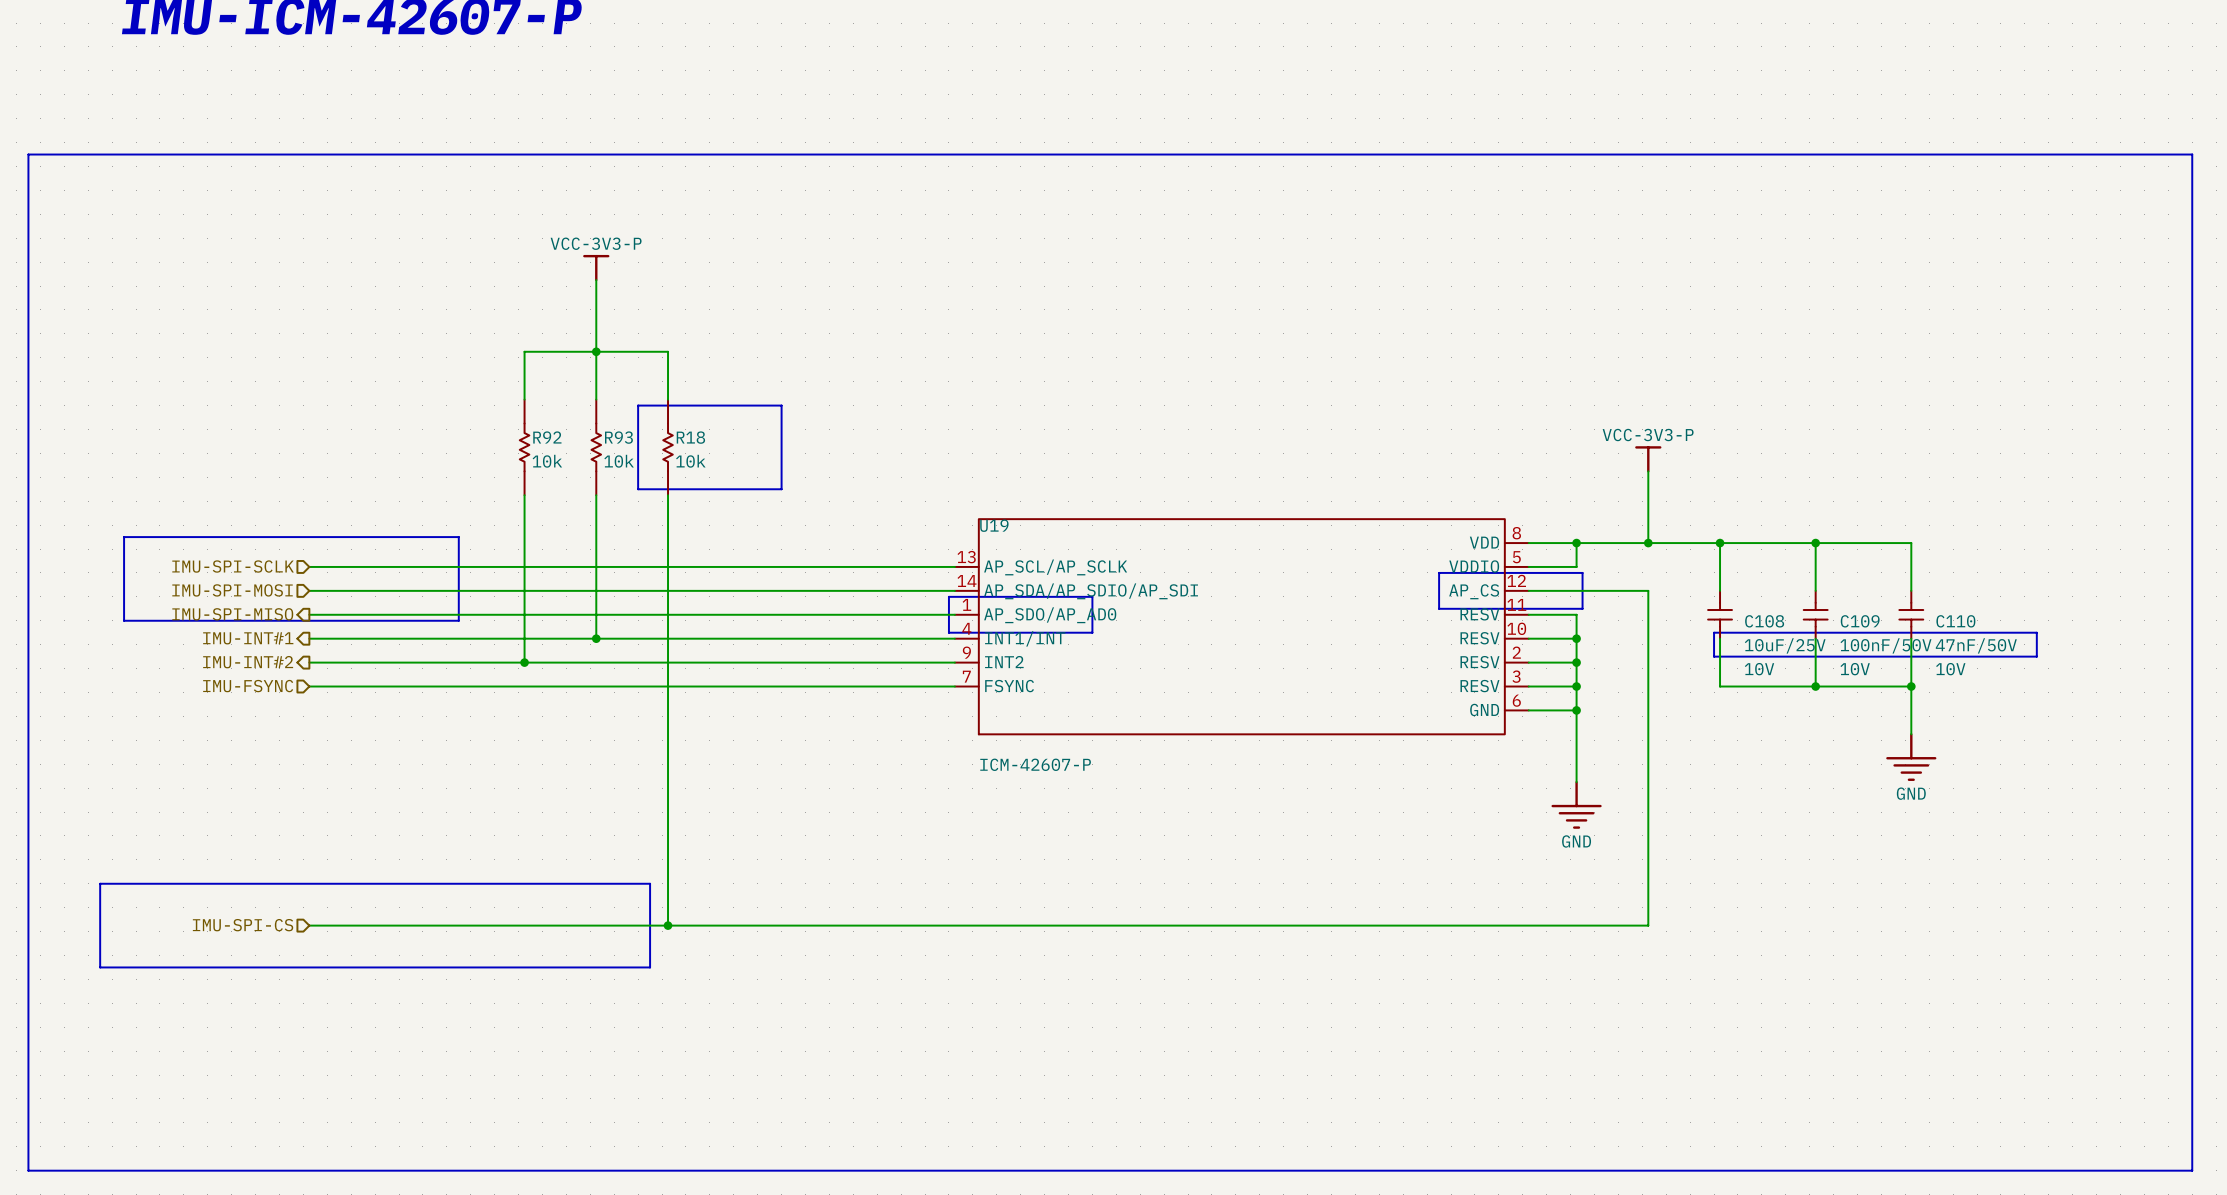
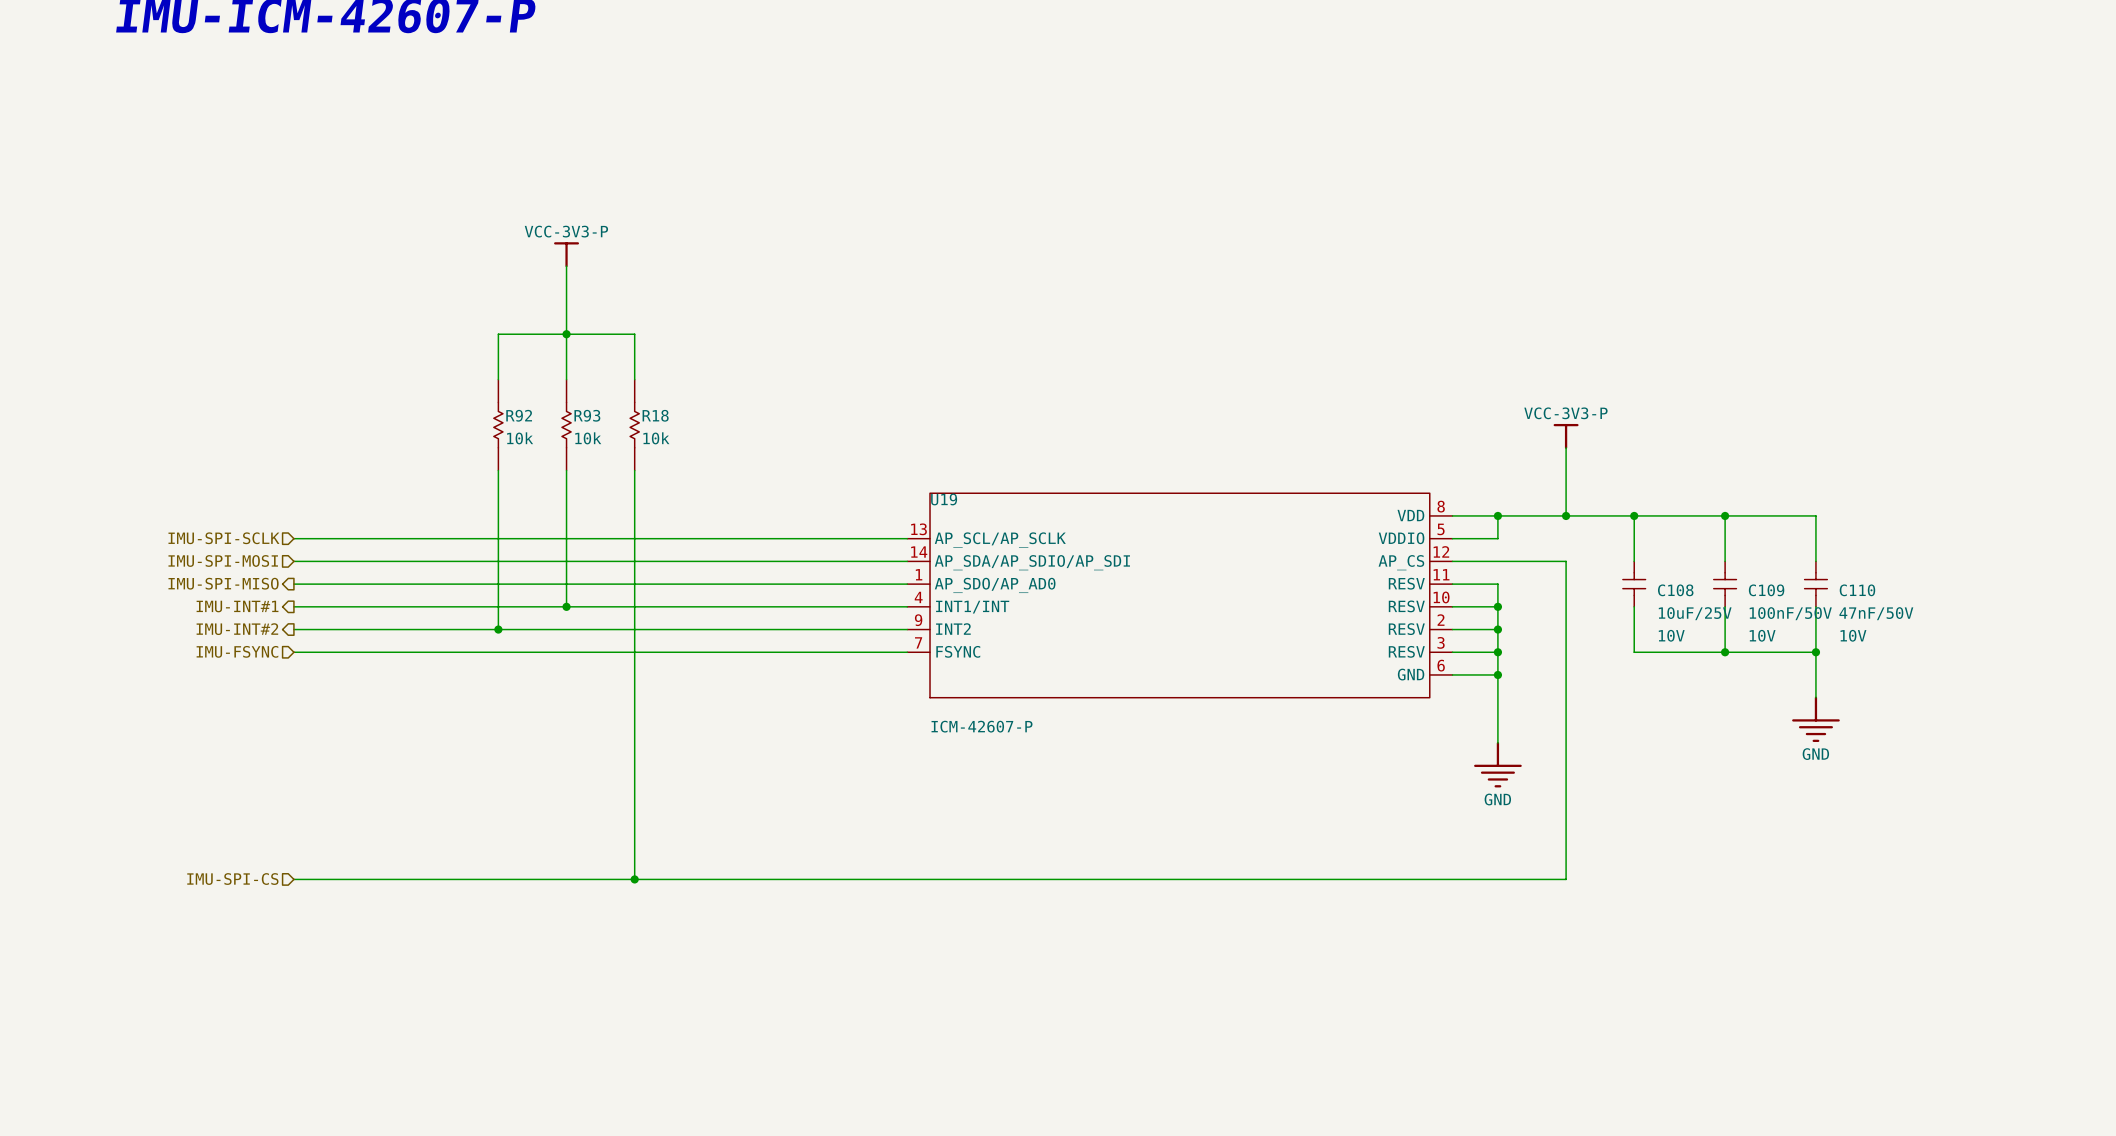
line: (28, 154) (2192, 154) (2192, 1170) (28, 1170) (28, 154) -> none
line: (638, 405) (781, 405) (781, 489) (638, 489) (638, 405) -> none
line: (124, 537) (458, 537) (458, 620) (124, 620) (124, 537) -> none
line: (1439, 572) (1582, 572) (1582, 608) (1439, 608) (1439, 572) -> none
line: (948, 596) (1092, 596) (1092, 632) (948, 632) (948, 596) -> none
line: (1714, 632) (2036, 632) (2036, 656) (1714, 656) (1714, 632) -> none
line: (100, 883) (650, 883) (650, 967) (100, 967) (100, 883) -> none

